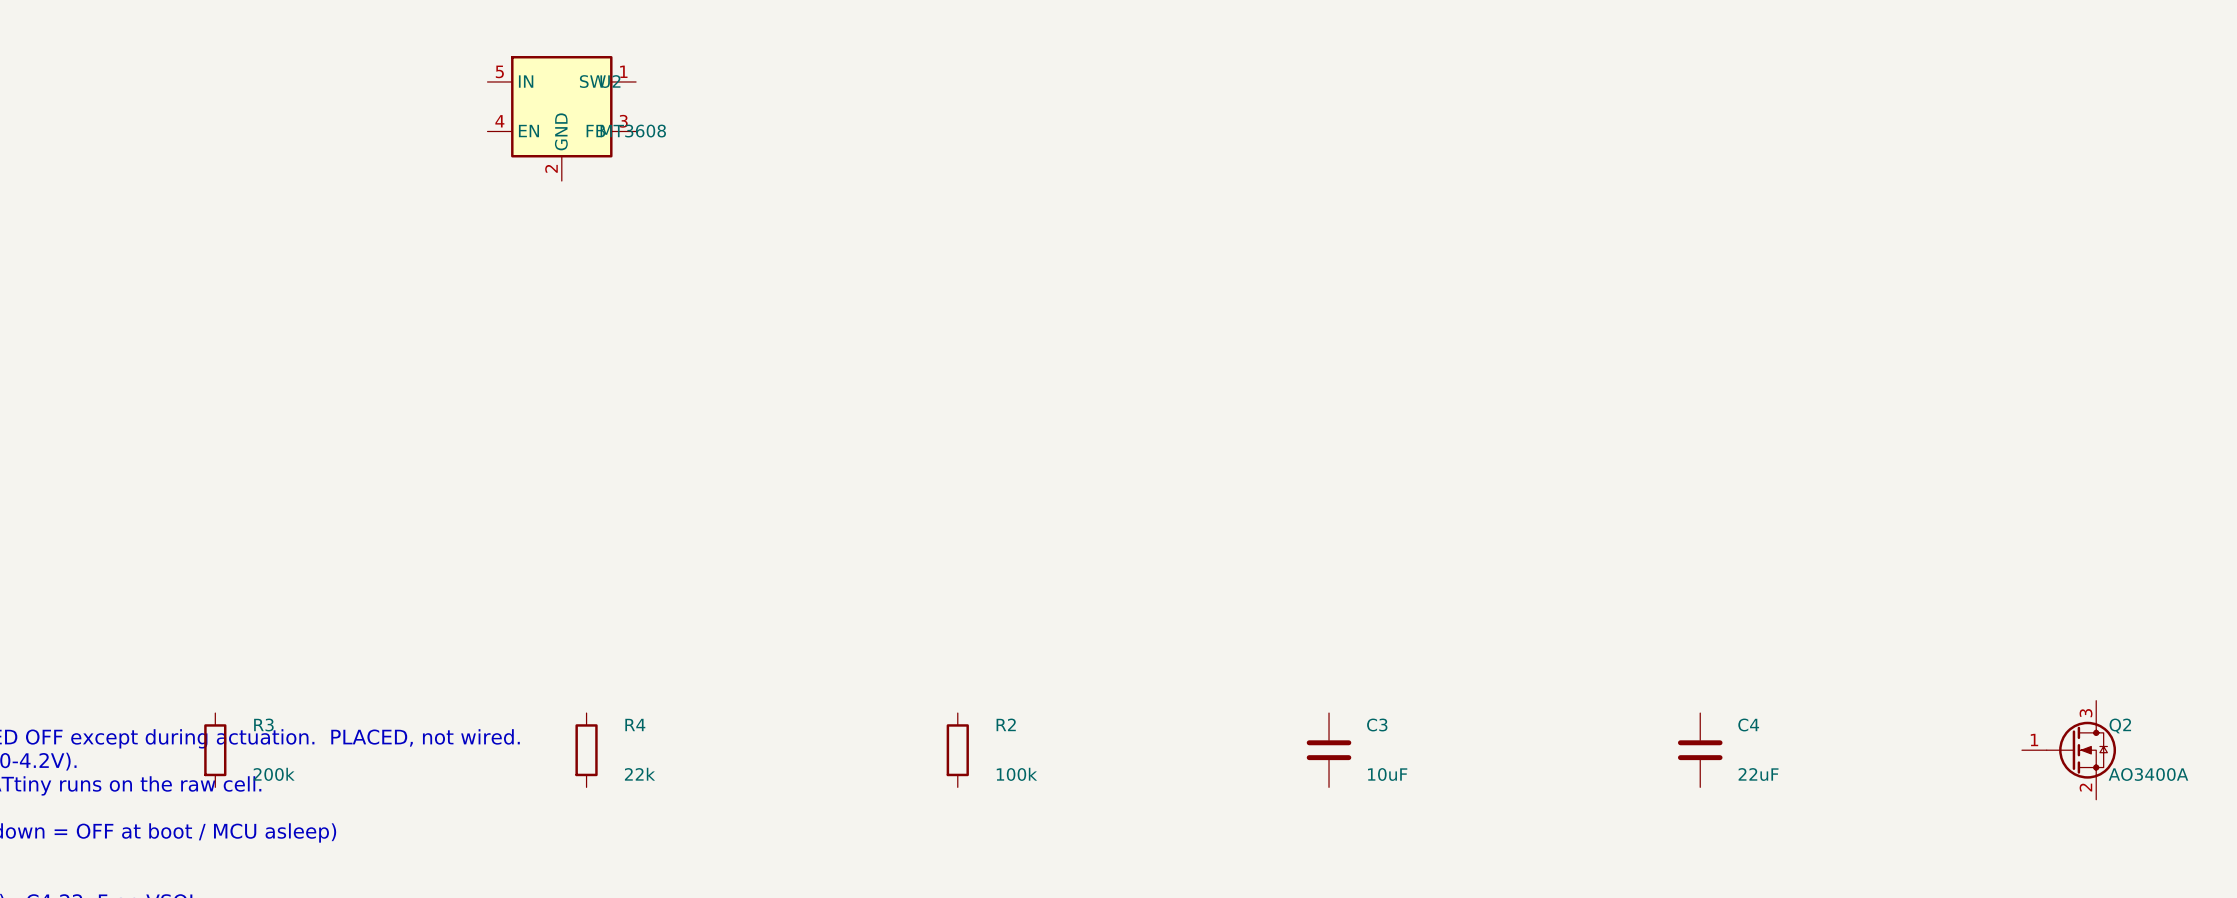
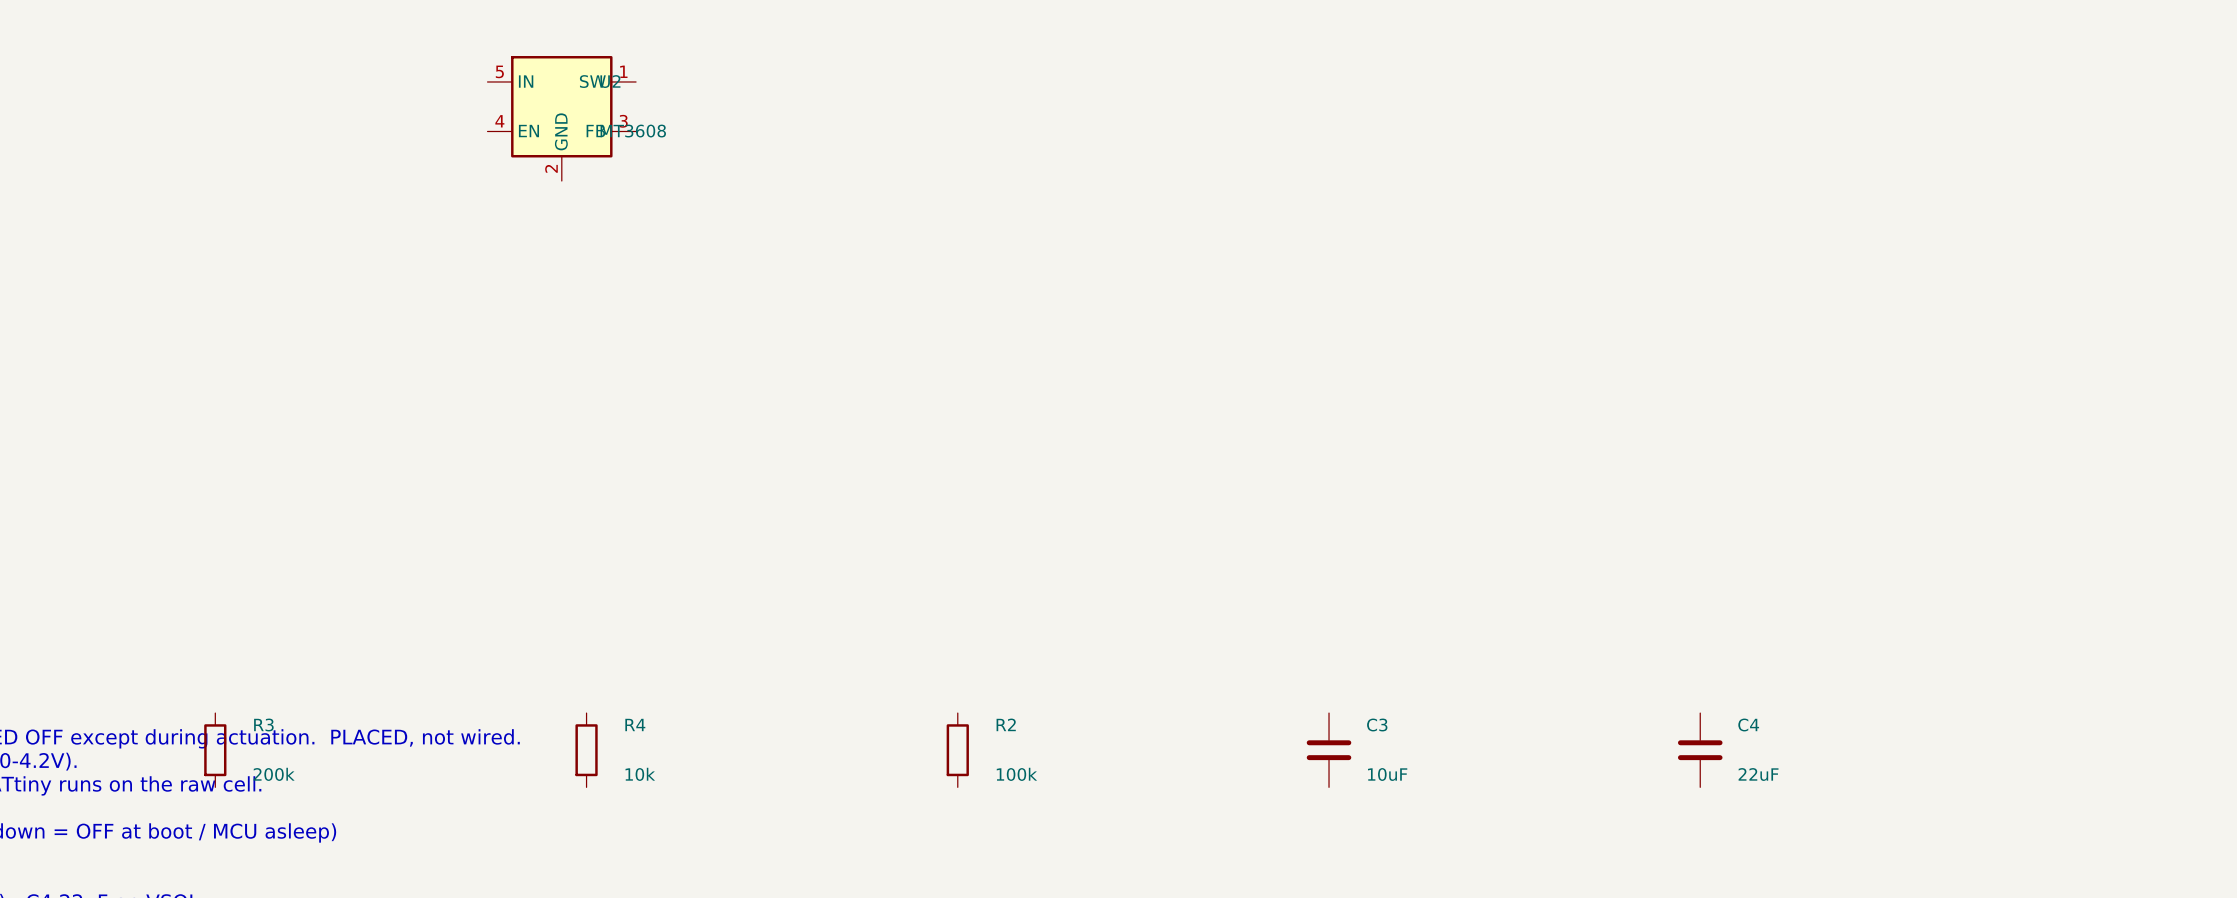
Q2: AO3400A (2069, 750) -> none
R4 value: 22k (639, 774) -> 10k (640, 774)

